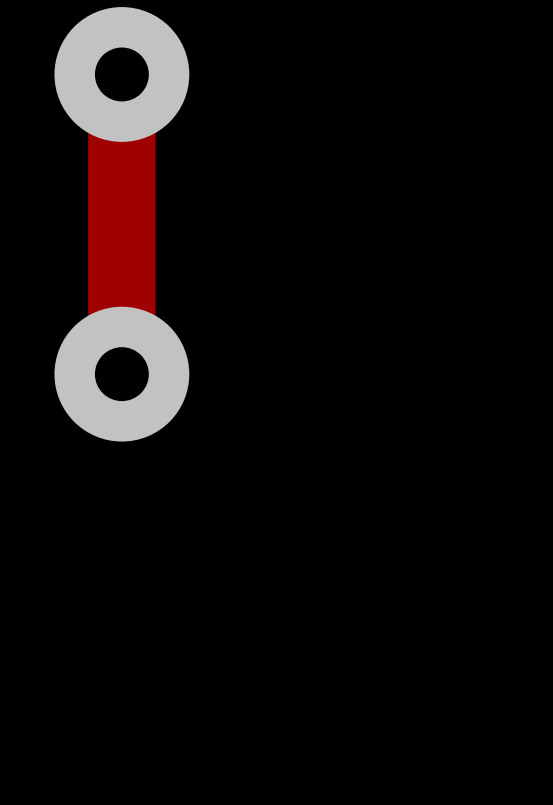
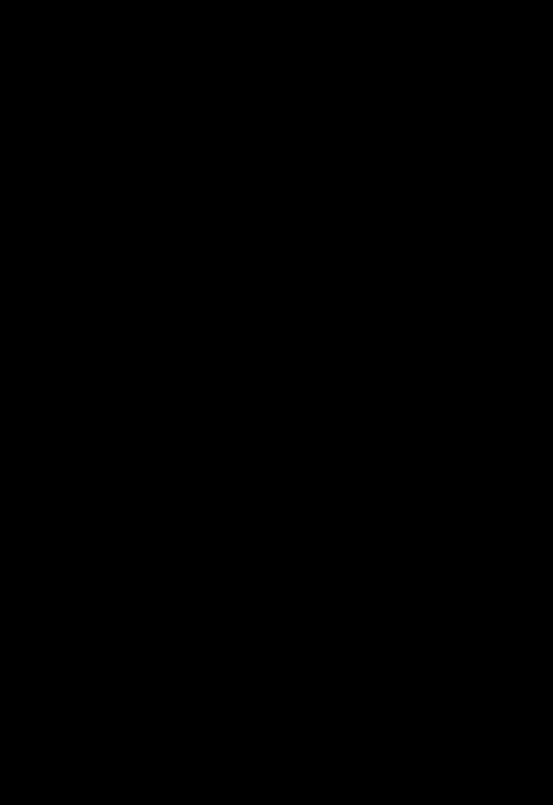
track: (121, 74) (121, 374) -> none
via: (121, 74) -> none
via: (121, 374) -> none

